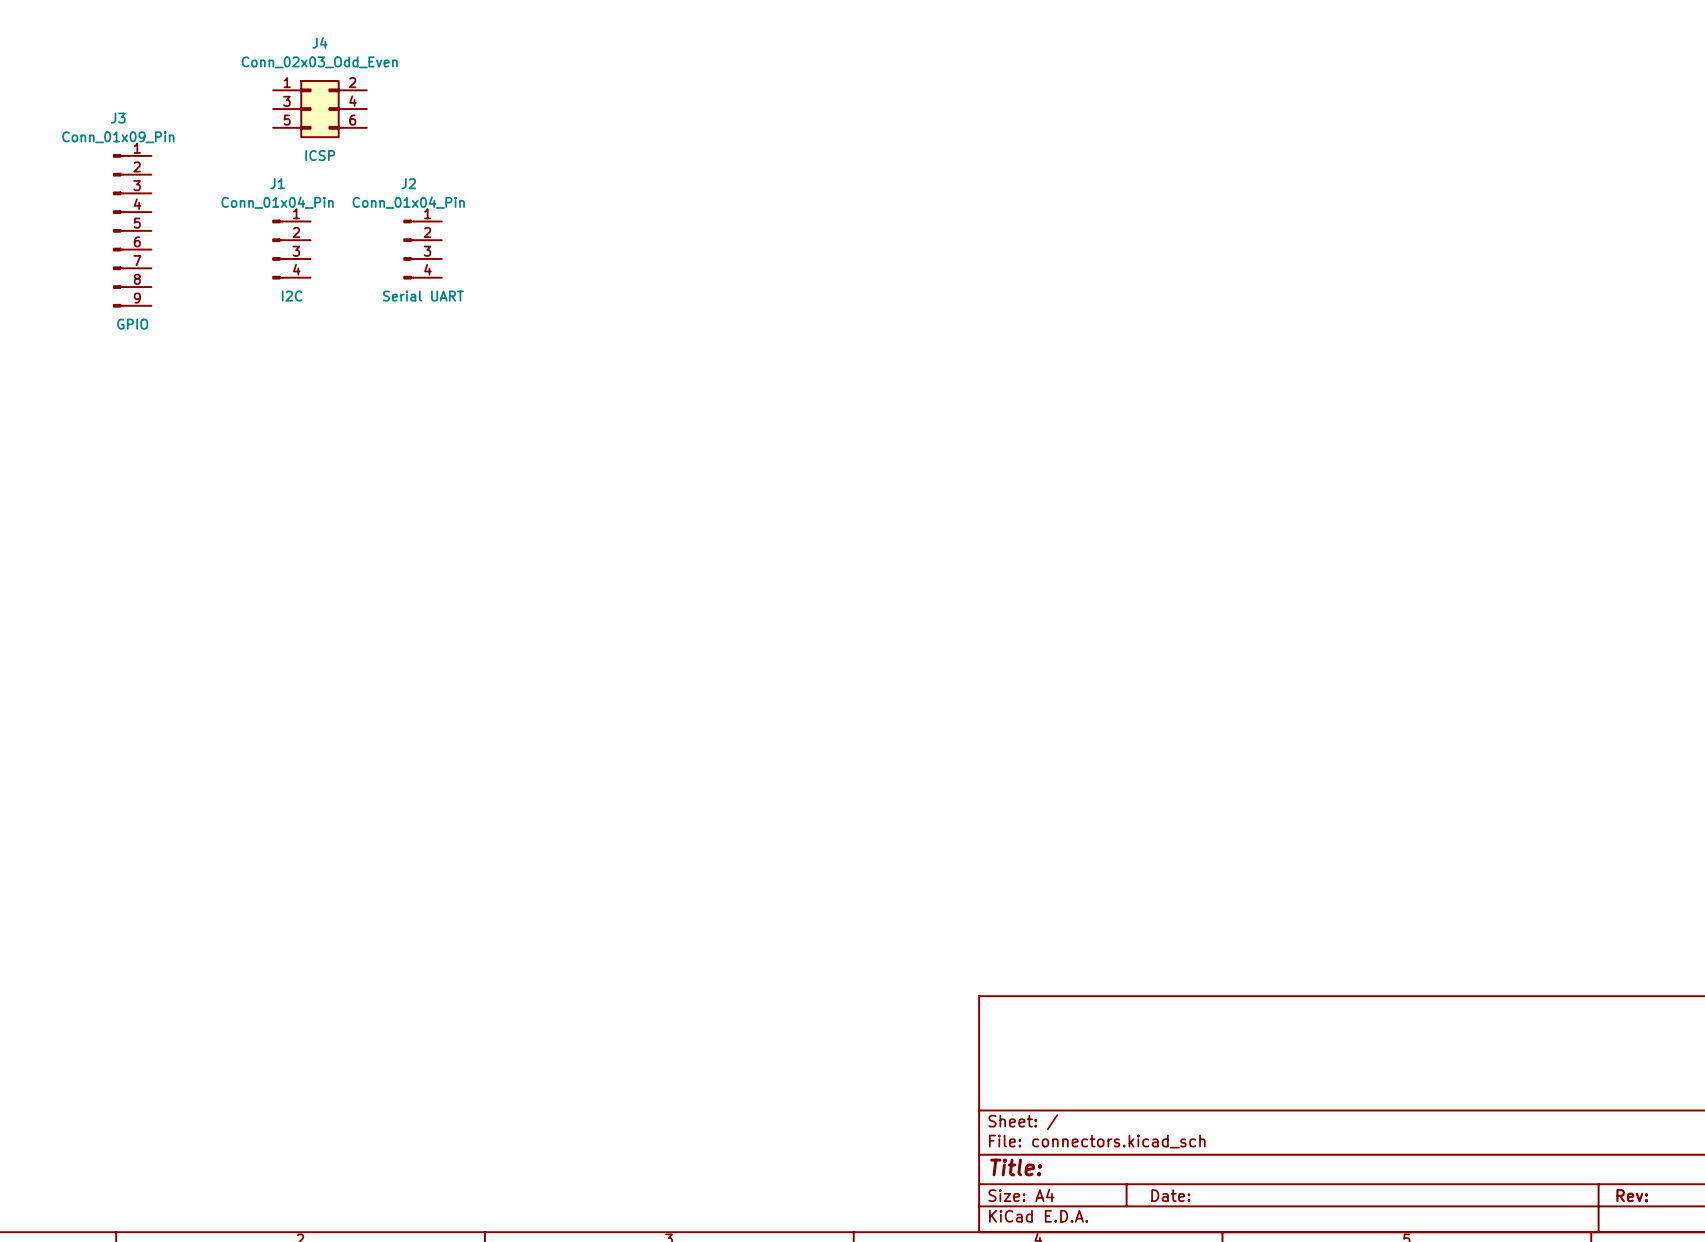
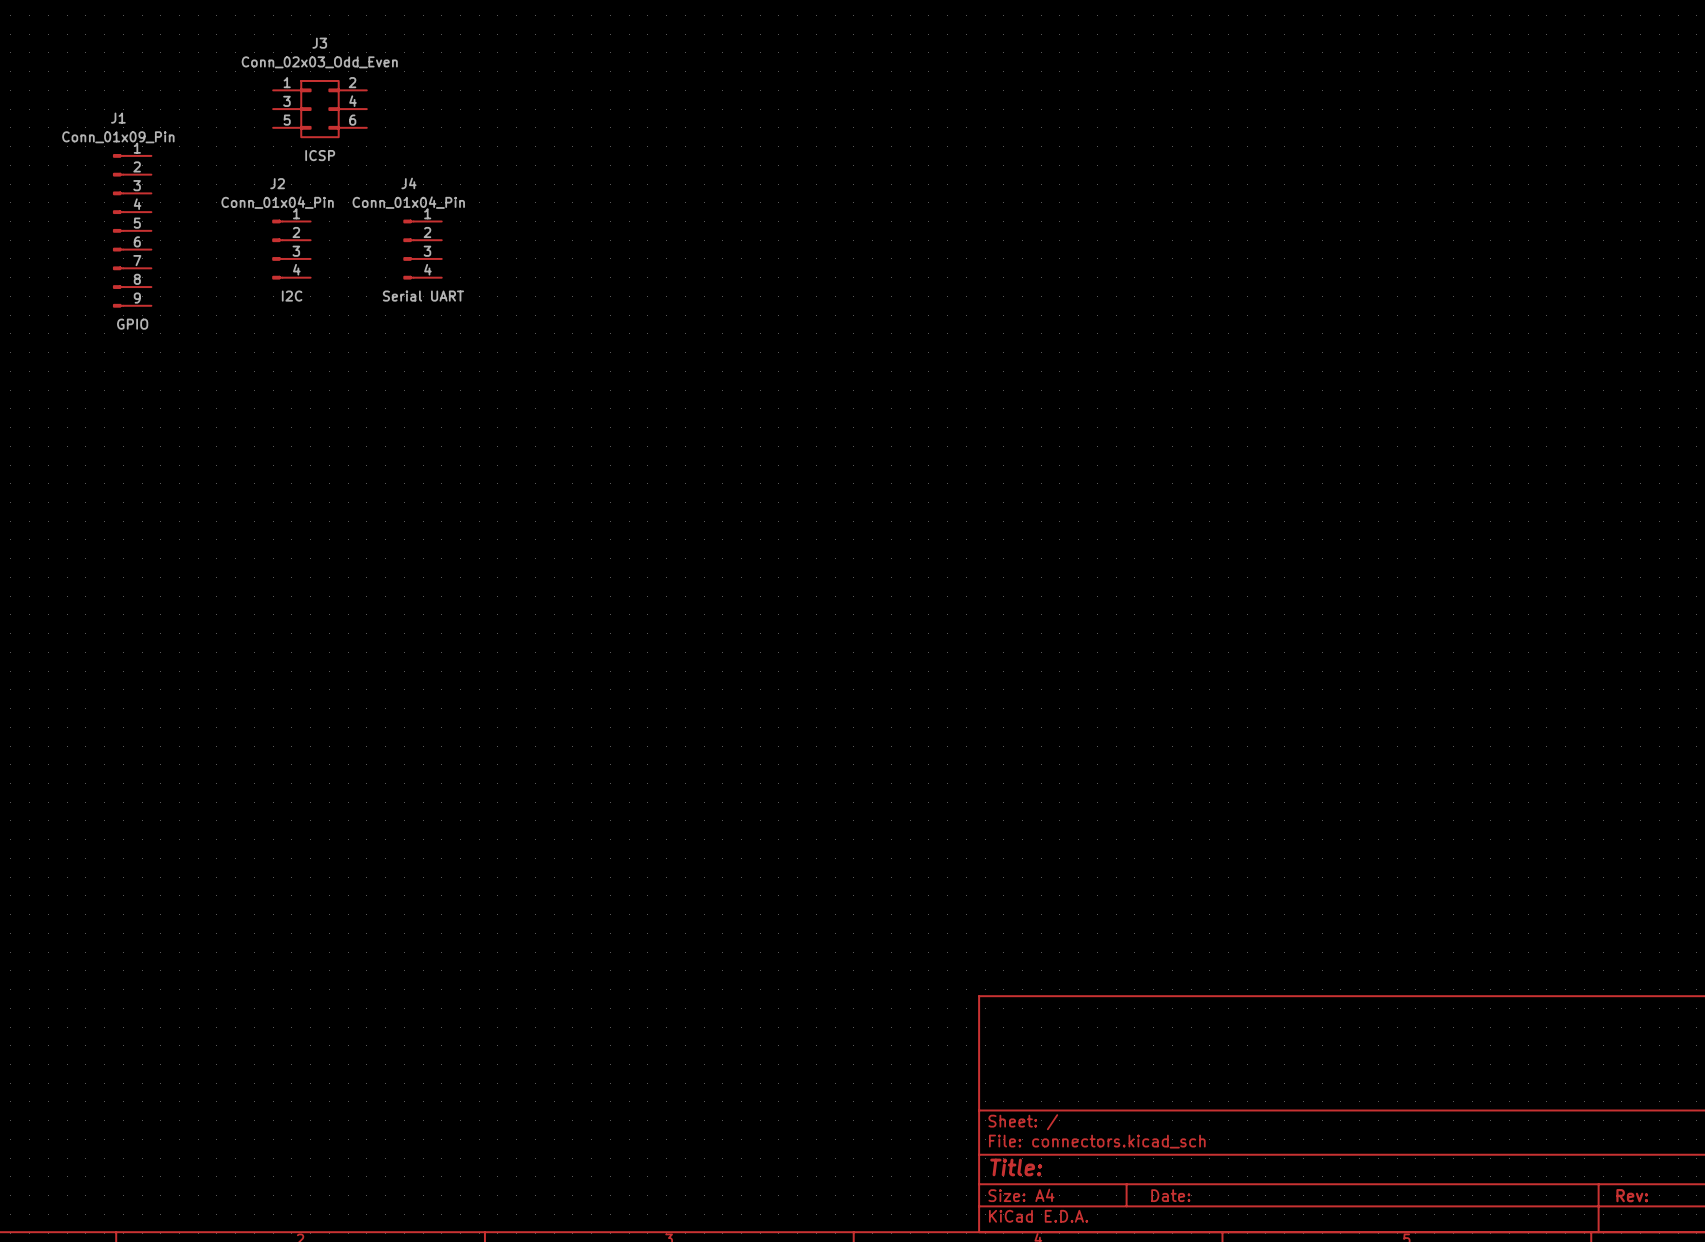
J4 name: J4 (319, 42) -> J3 (319, 43)
J3 name: J3 (118, 118) -> J1 (118, 118)
J1 name: J1 (277, 183) -> J2 (277, 183)
J2 name: J2 (408, 183) -> J4 (408, 183)

